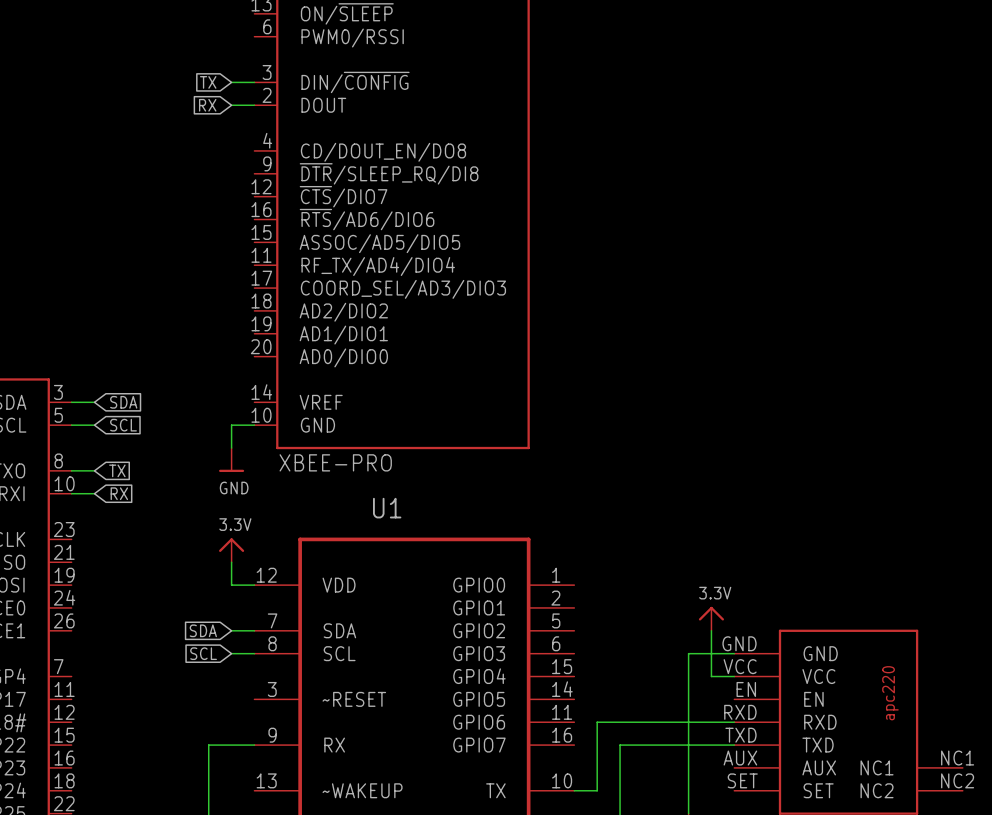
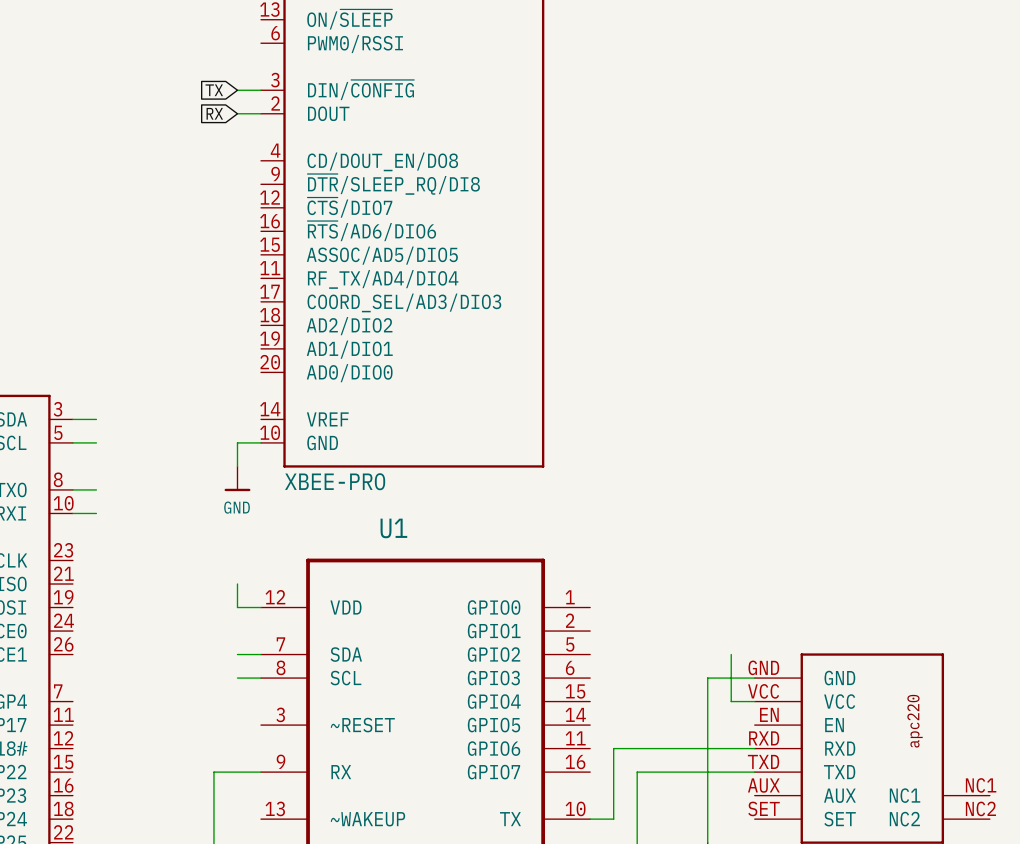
global label: SDA (123, 402) -> none
global label: SCL (123, 425) -> none
global label: TX (117, 470) -> none
global label: RX (119, 493) -> none
power symbol: 3.3V (231, 550) -> none
power symbol: 3.3V (711, 618) -> none
global label: SDA (203, 630) -> none
global label: SCL (203, 653) -> none

